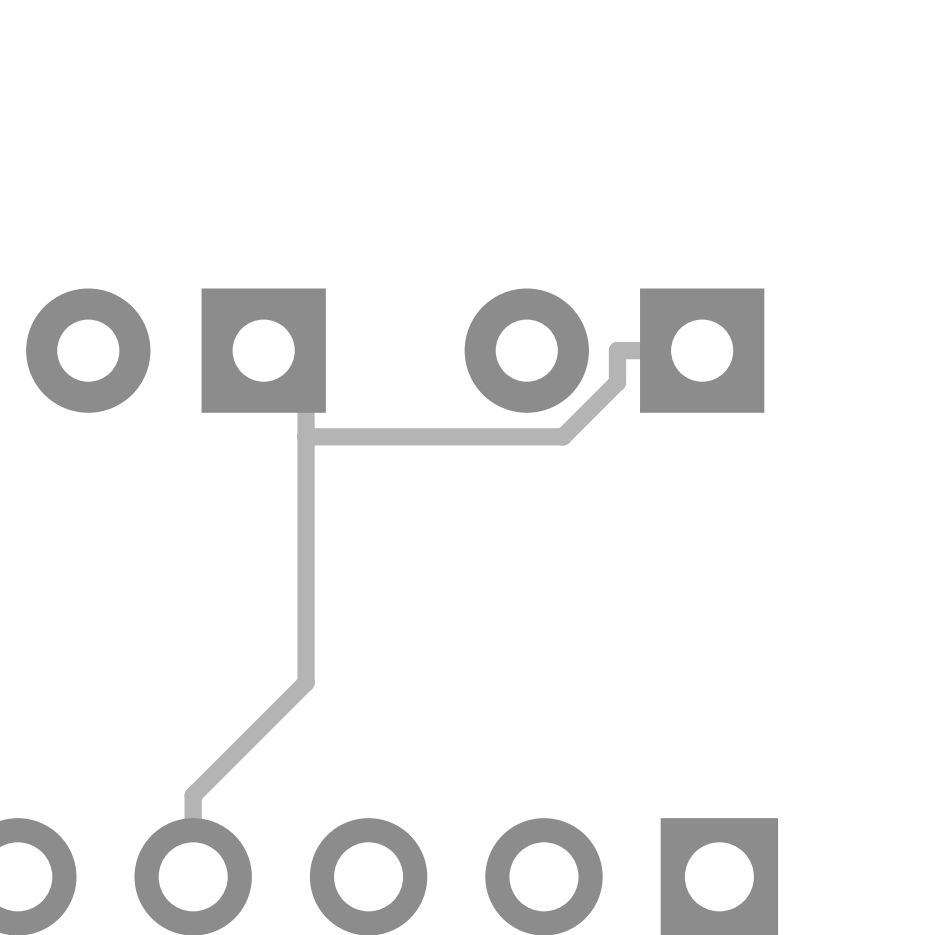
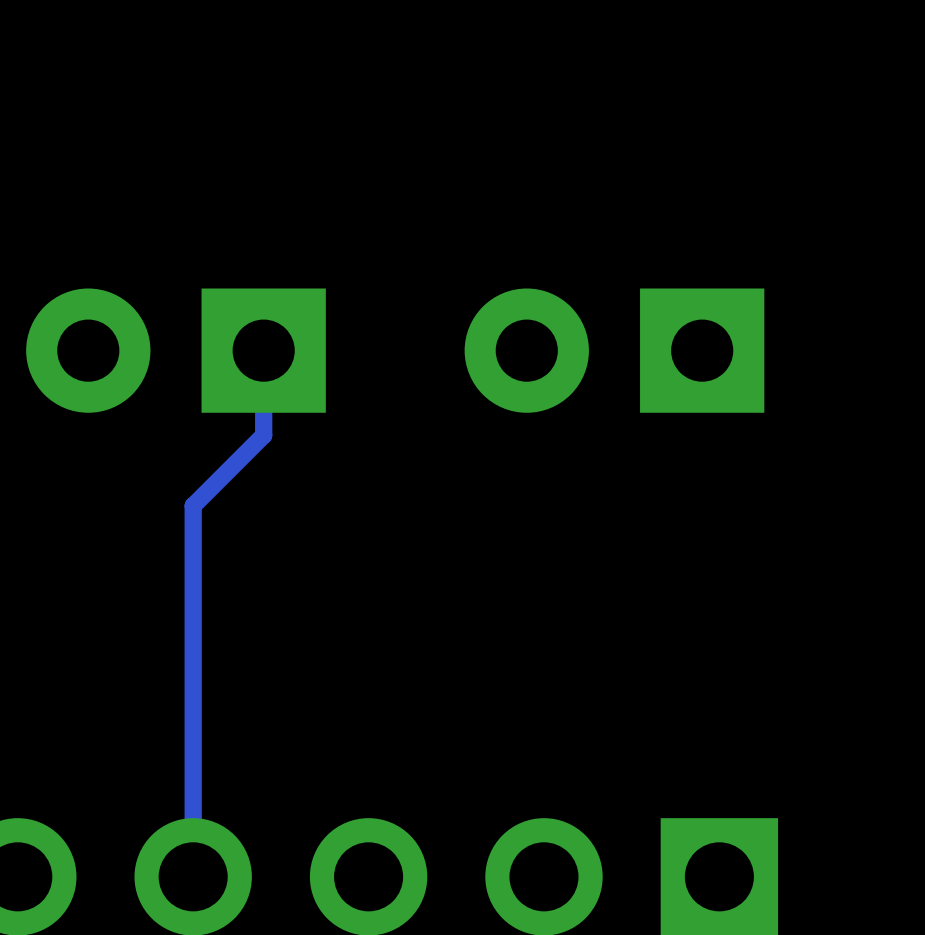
track: (263, 350) (306, 350) (306, 682) (193, 795) -> (263, 350) (263, 435) (193, 505) (193, 795)
track: (702, 350) (617, 350) (617, 382) (563, 436) (306, 436) -> none

